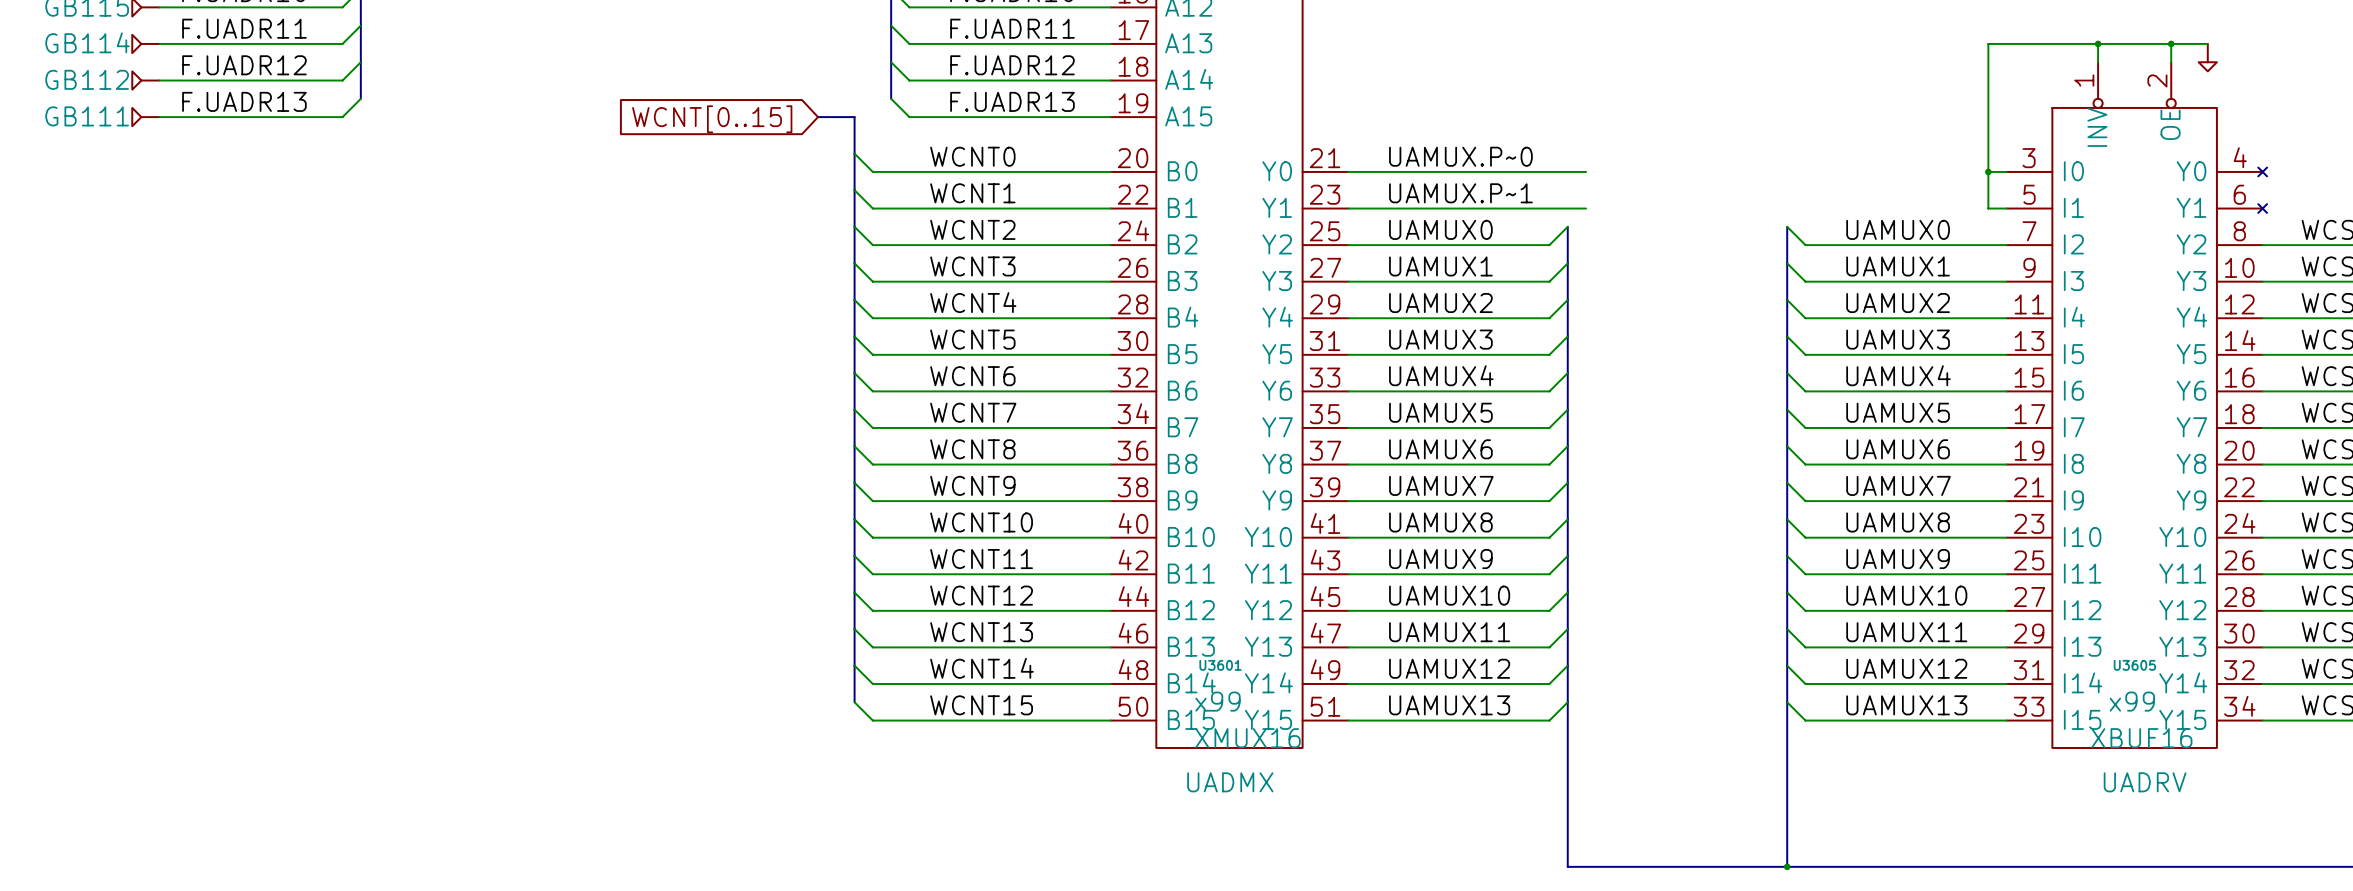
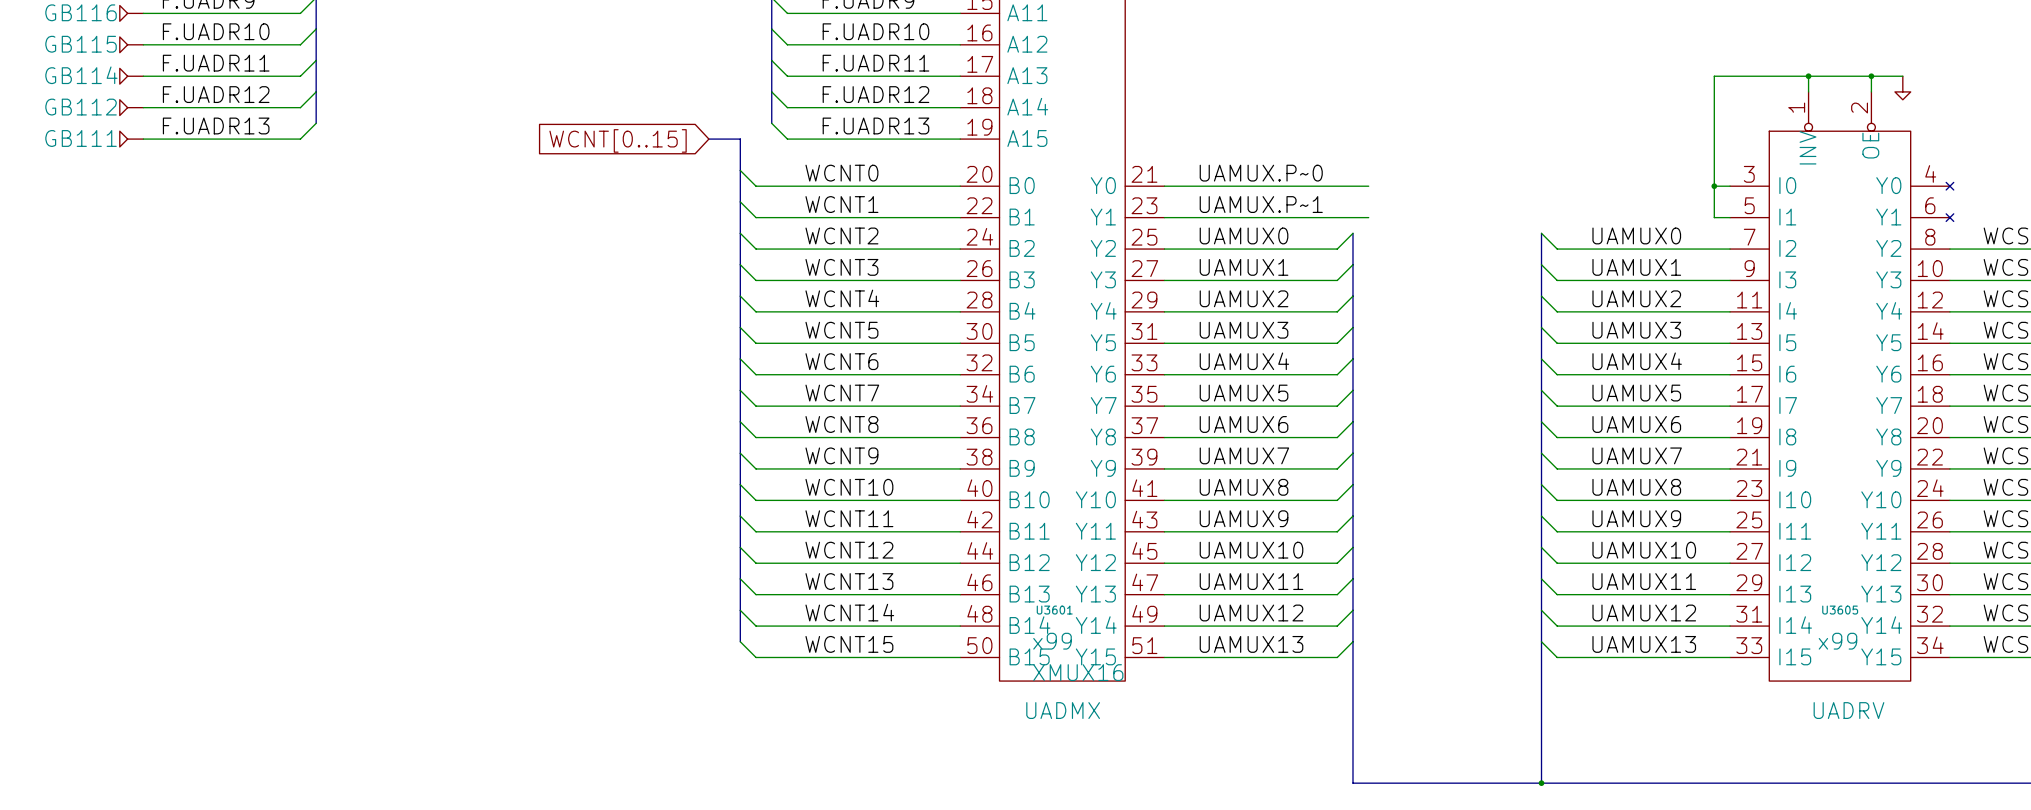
U3605 value: XBUF16 (2141, 738) -> none

